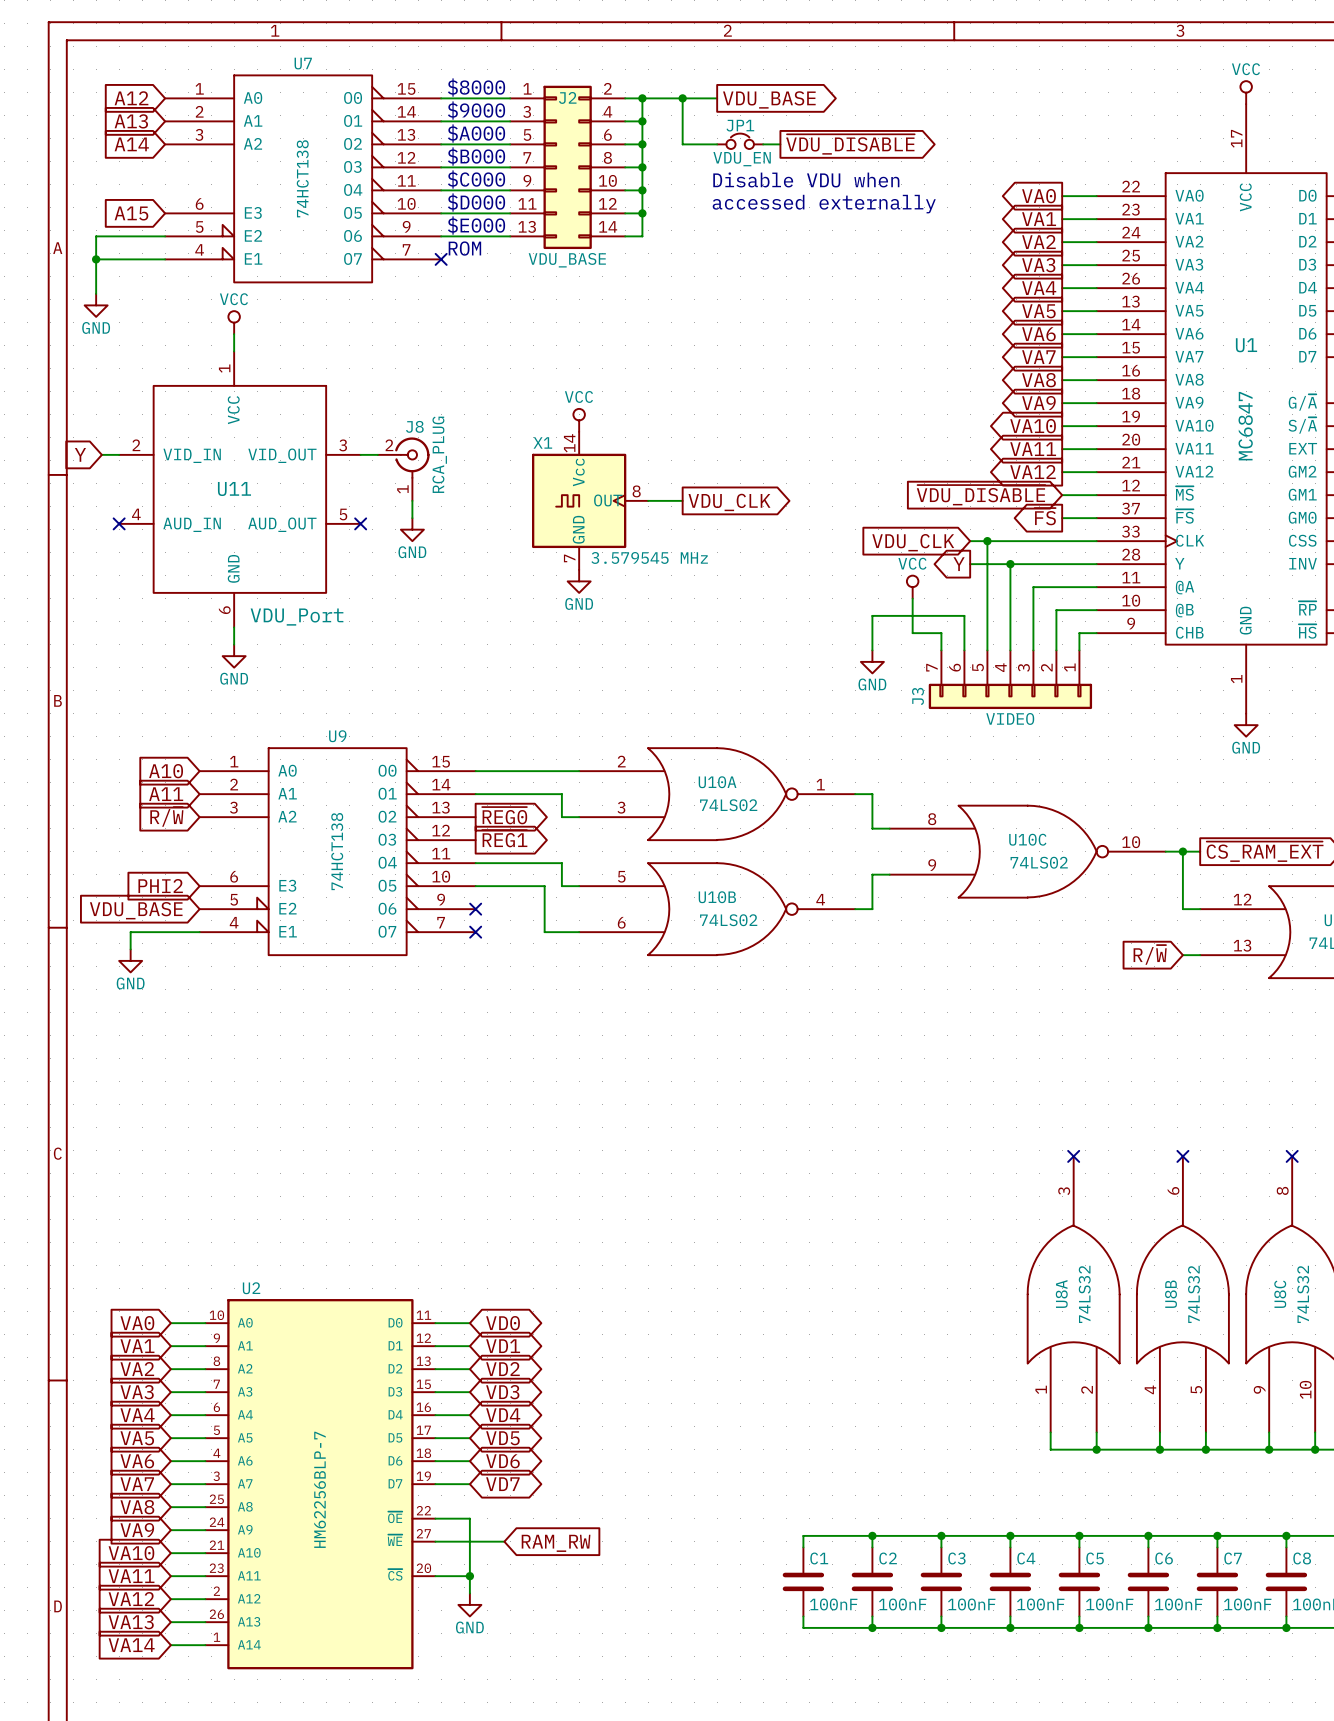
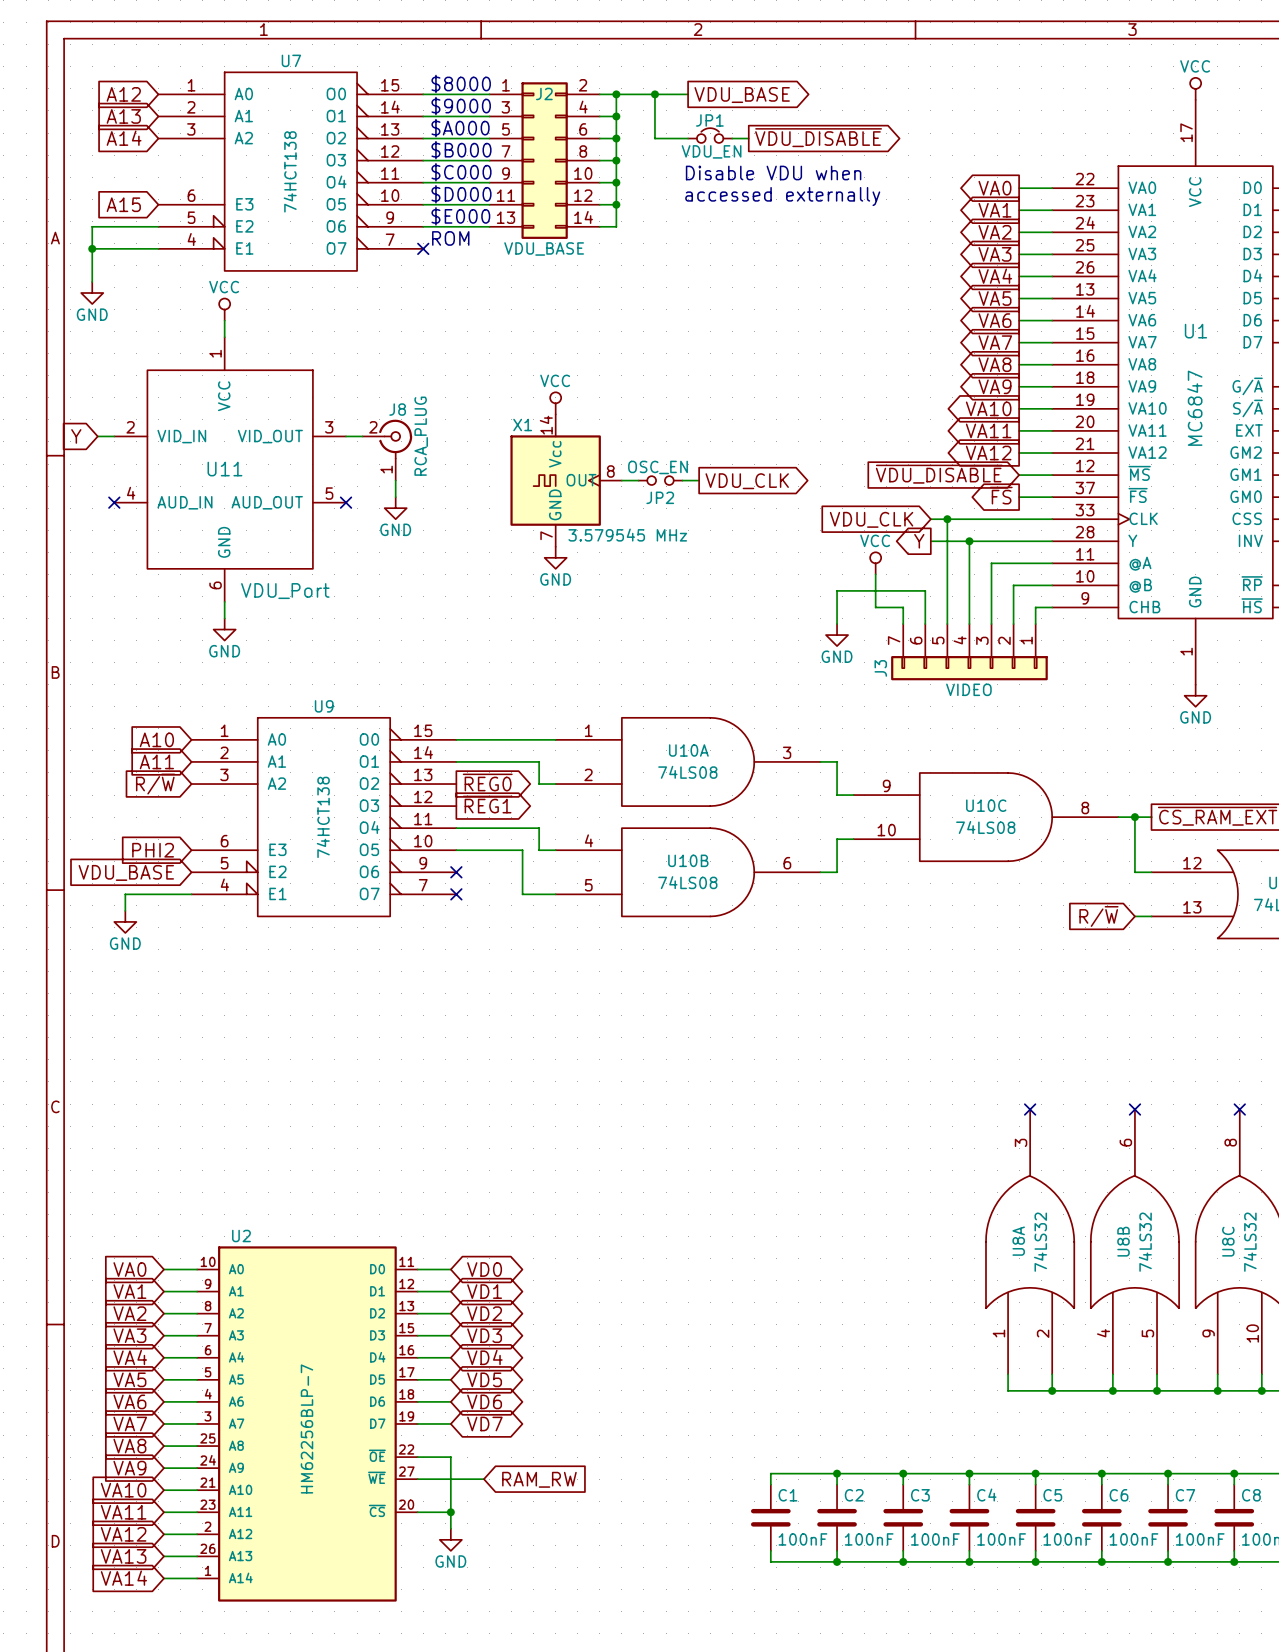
JP2: none -> OSC_EN (660, 480)
global label position: VDU_CLK (729, 502) -> VDU_CLK (747, 481)
U10A symbol: [579, 747, 856, 842] -> [555, 717, 821, 807]
U10C symbol: [889, 804, 1166, 899] -> [853, 772, 1119, 862]
U10A value: 74LS02 (728, 805) -> 74LS08 (687, 772)
U10B symbol: [579, 862, 856, 957] -> [555, 828, 821, 917]
U10C value: 74LS02 (1039, 862) -> 74LS08 (985, 827)
U10B value: 74LS02 (728, 920) -> 74LS08 (687, 882)

